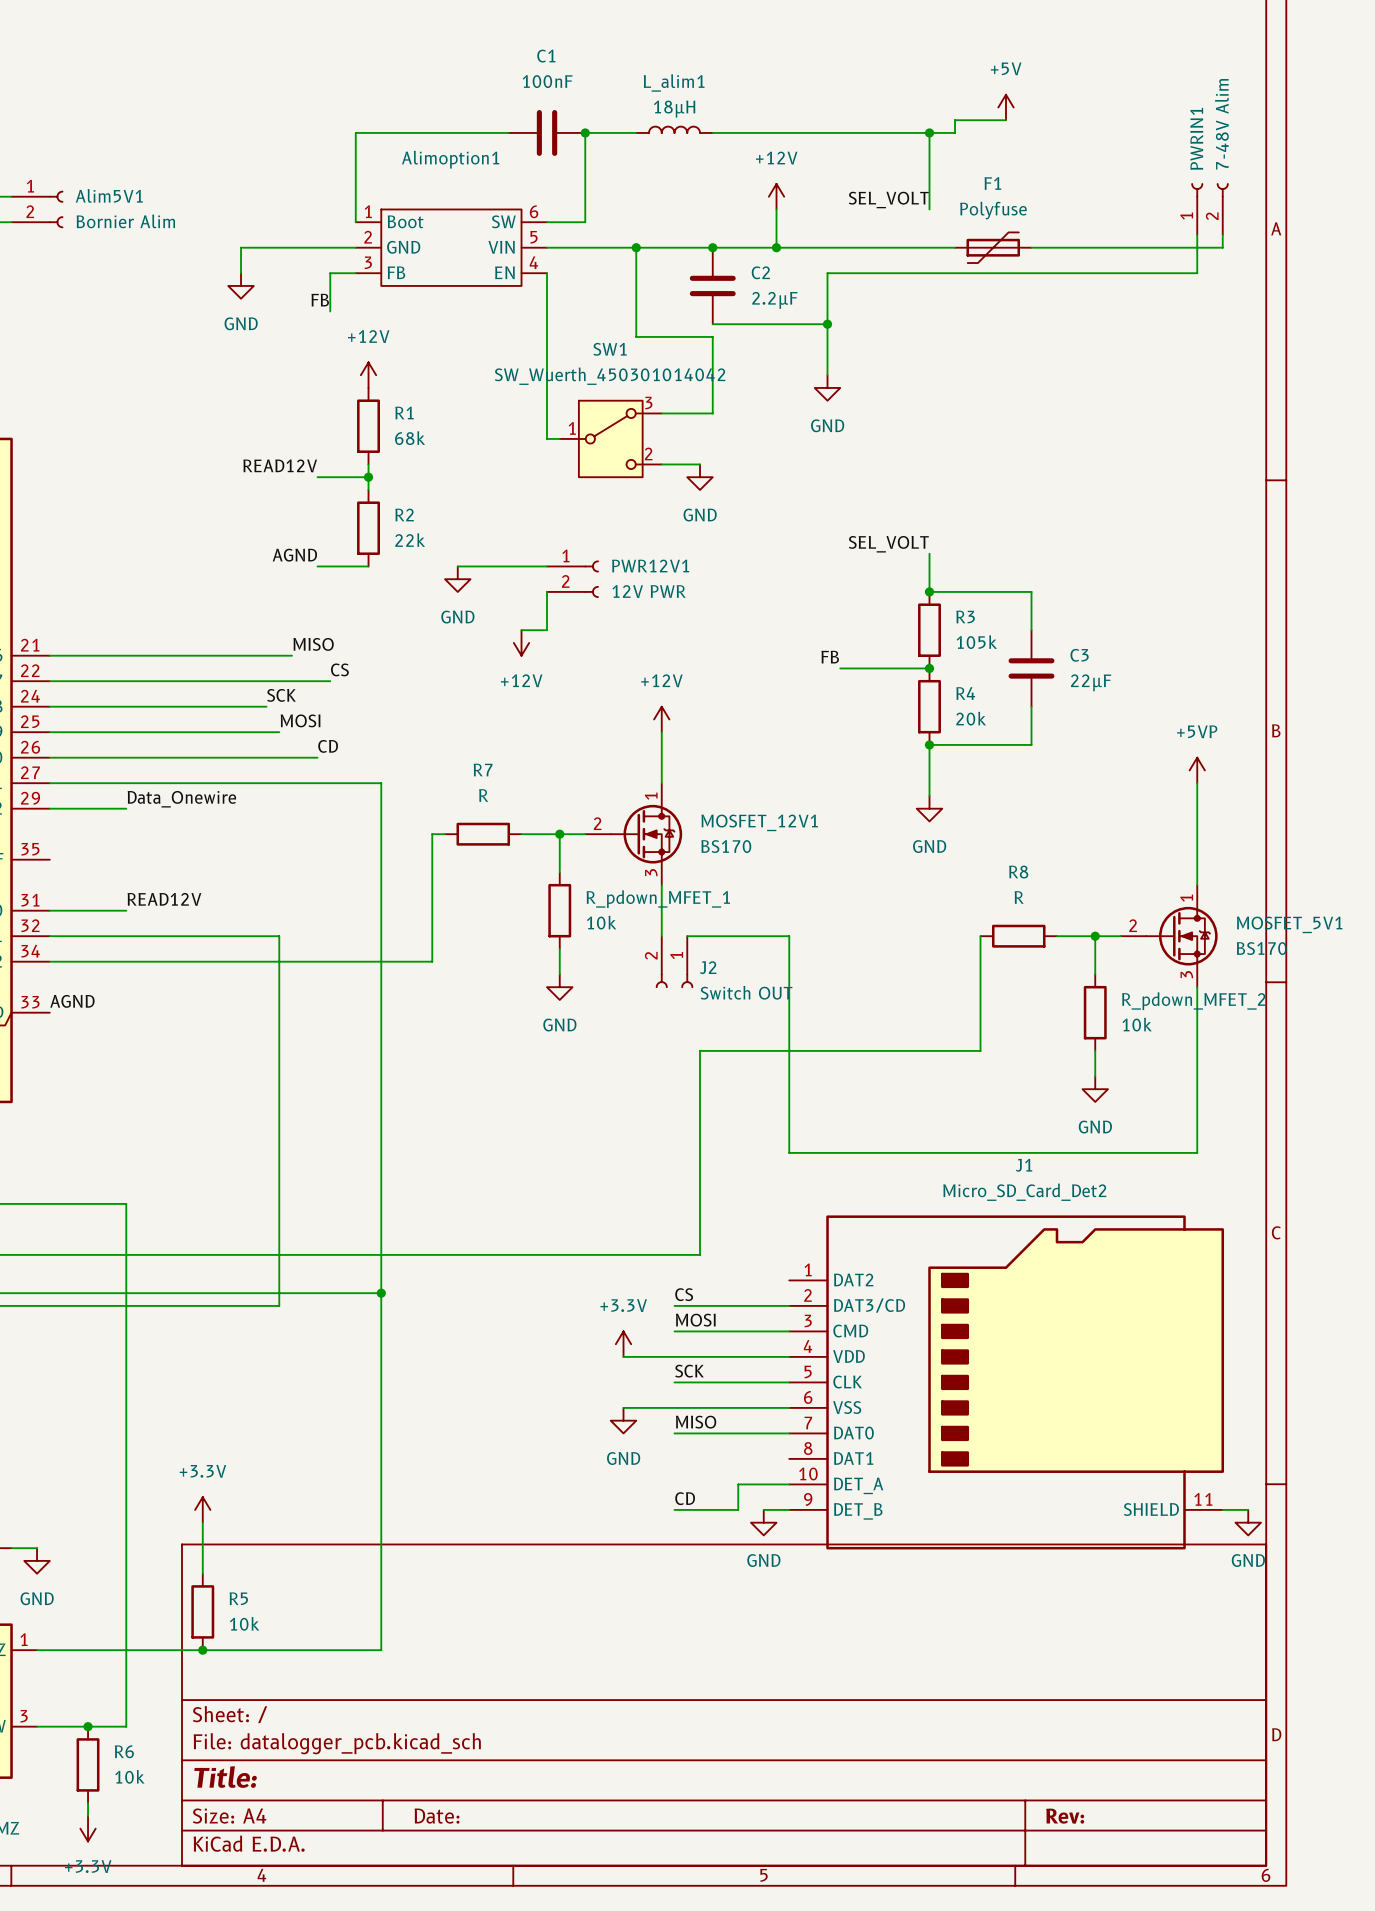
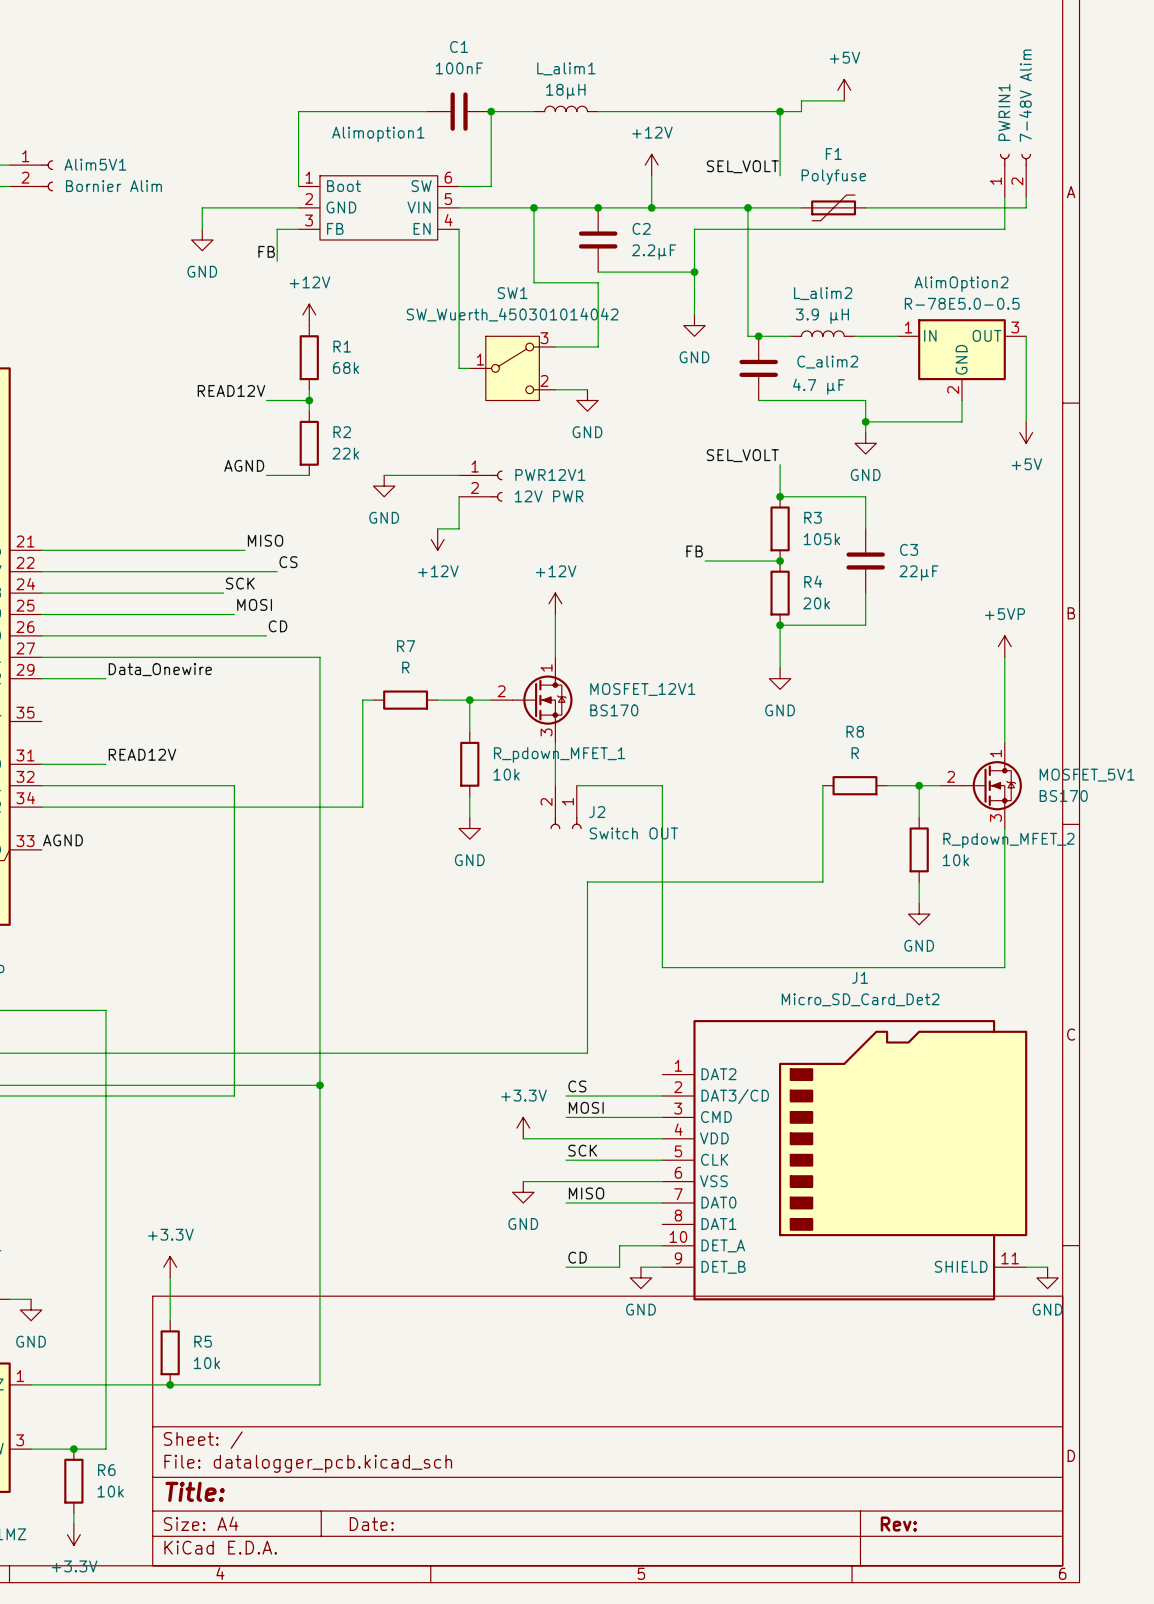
wire: none -> (747, 207) (747, 336) (790, 336)
junction: none -> (747, 207)
L_alim2: none -> 3.9 µH (822, 333)
junction: none -> (758, 336)
wire: none -> (854, 336) (897, 336)
wire: none -> (1026, 336) (1026, 421)
AlimOption2: none -> R-78E5.0-0.5 (961, 359)
C_alim2: none -> 4.7 µF (758, 368)
wire: none -> (758, 400) (865, 400) (865, 432)
wire: none -> (961, 400) (961, 421) (865, 421)
junction: none -> (865, 421)
power symbol: none -> +5V (1026, 432)
power symbol: none -> GND (865, 443)

